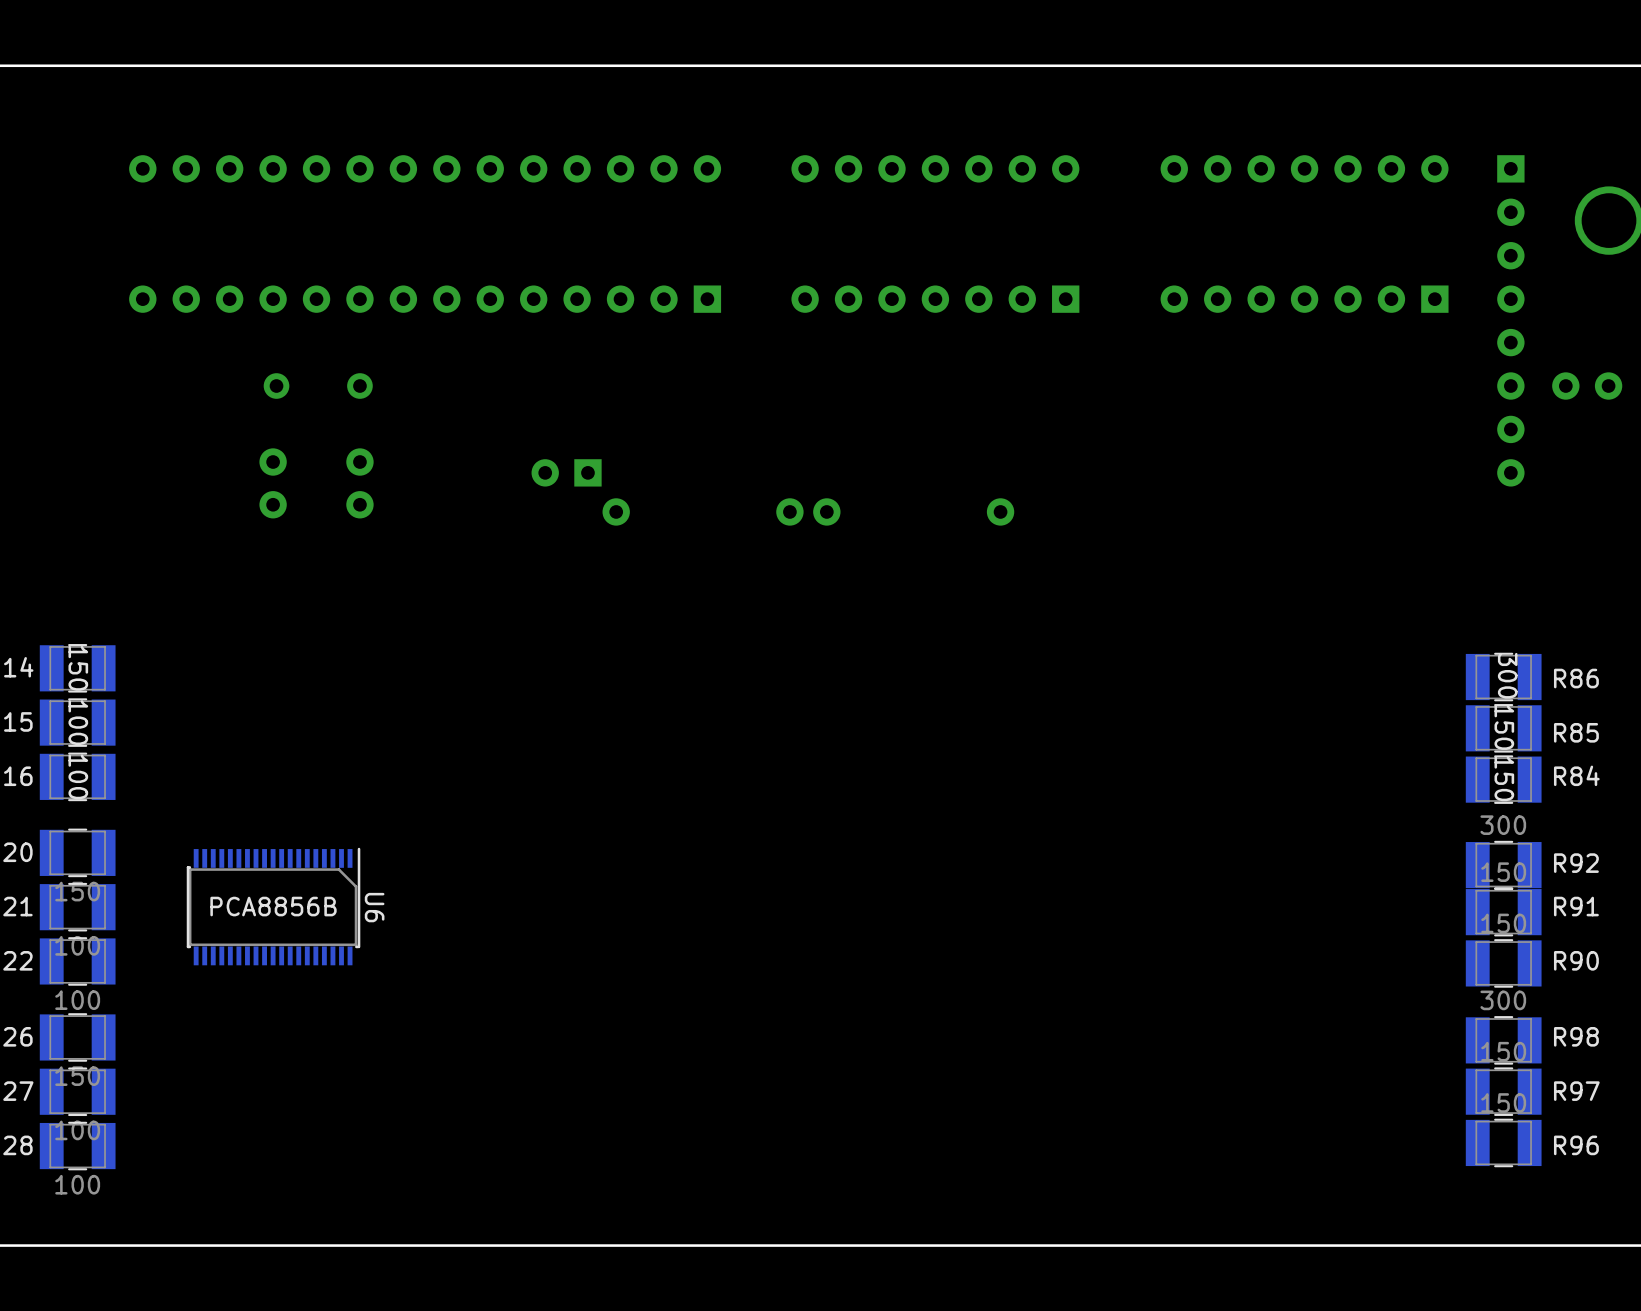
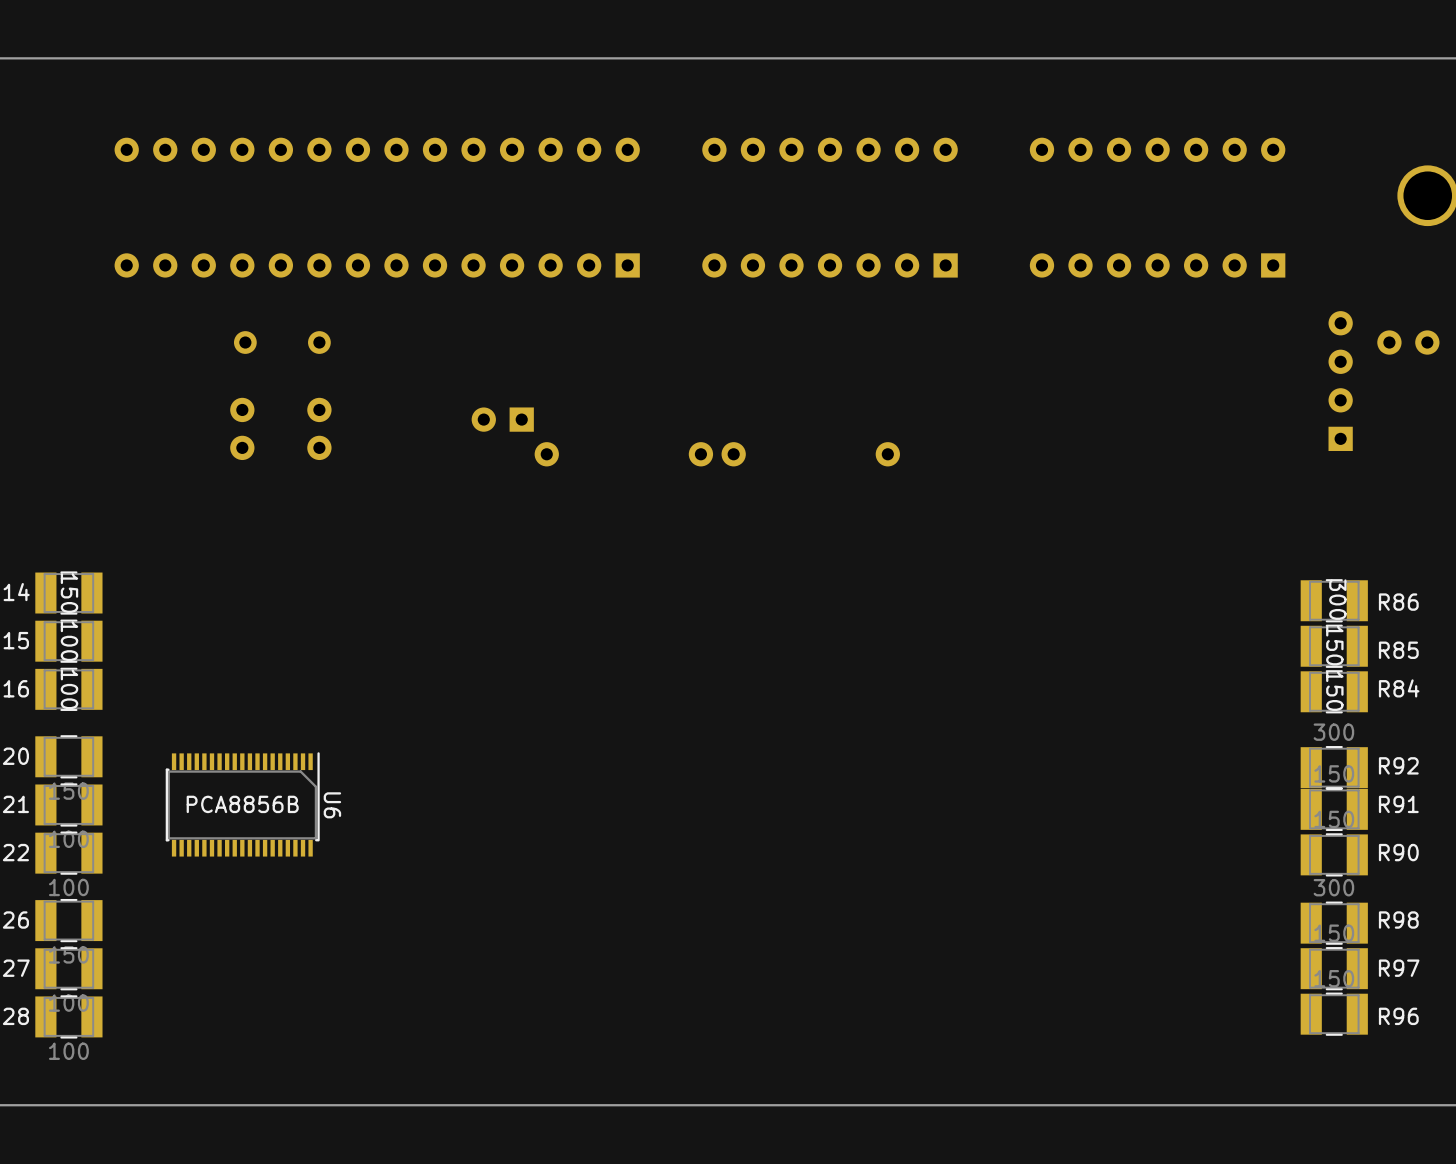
part: (1510, 320) -> none
part: none -> (1340, 381)

